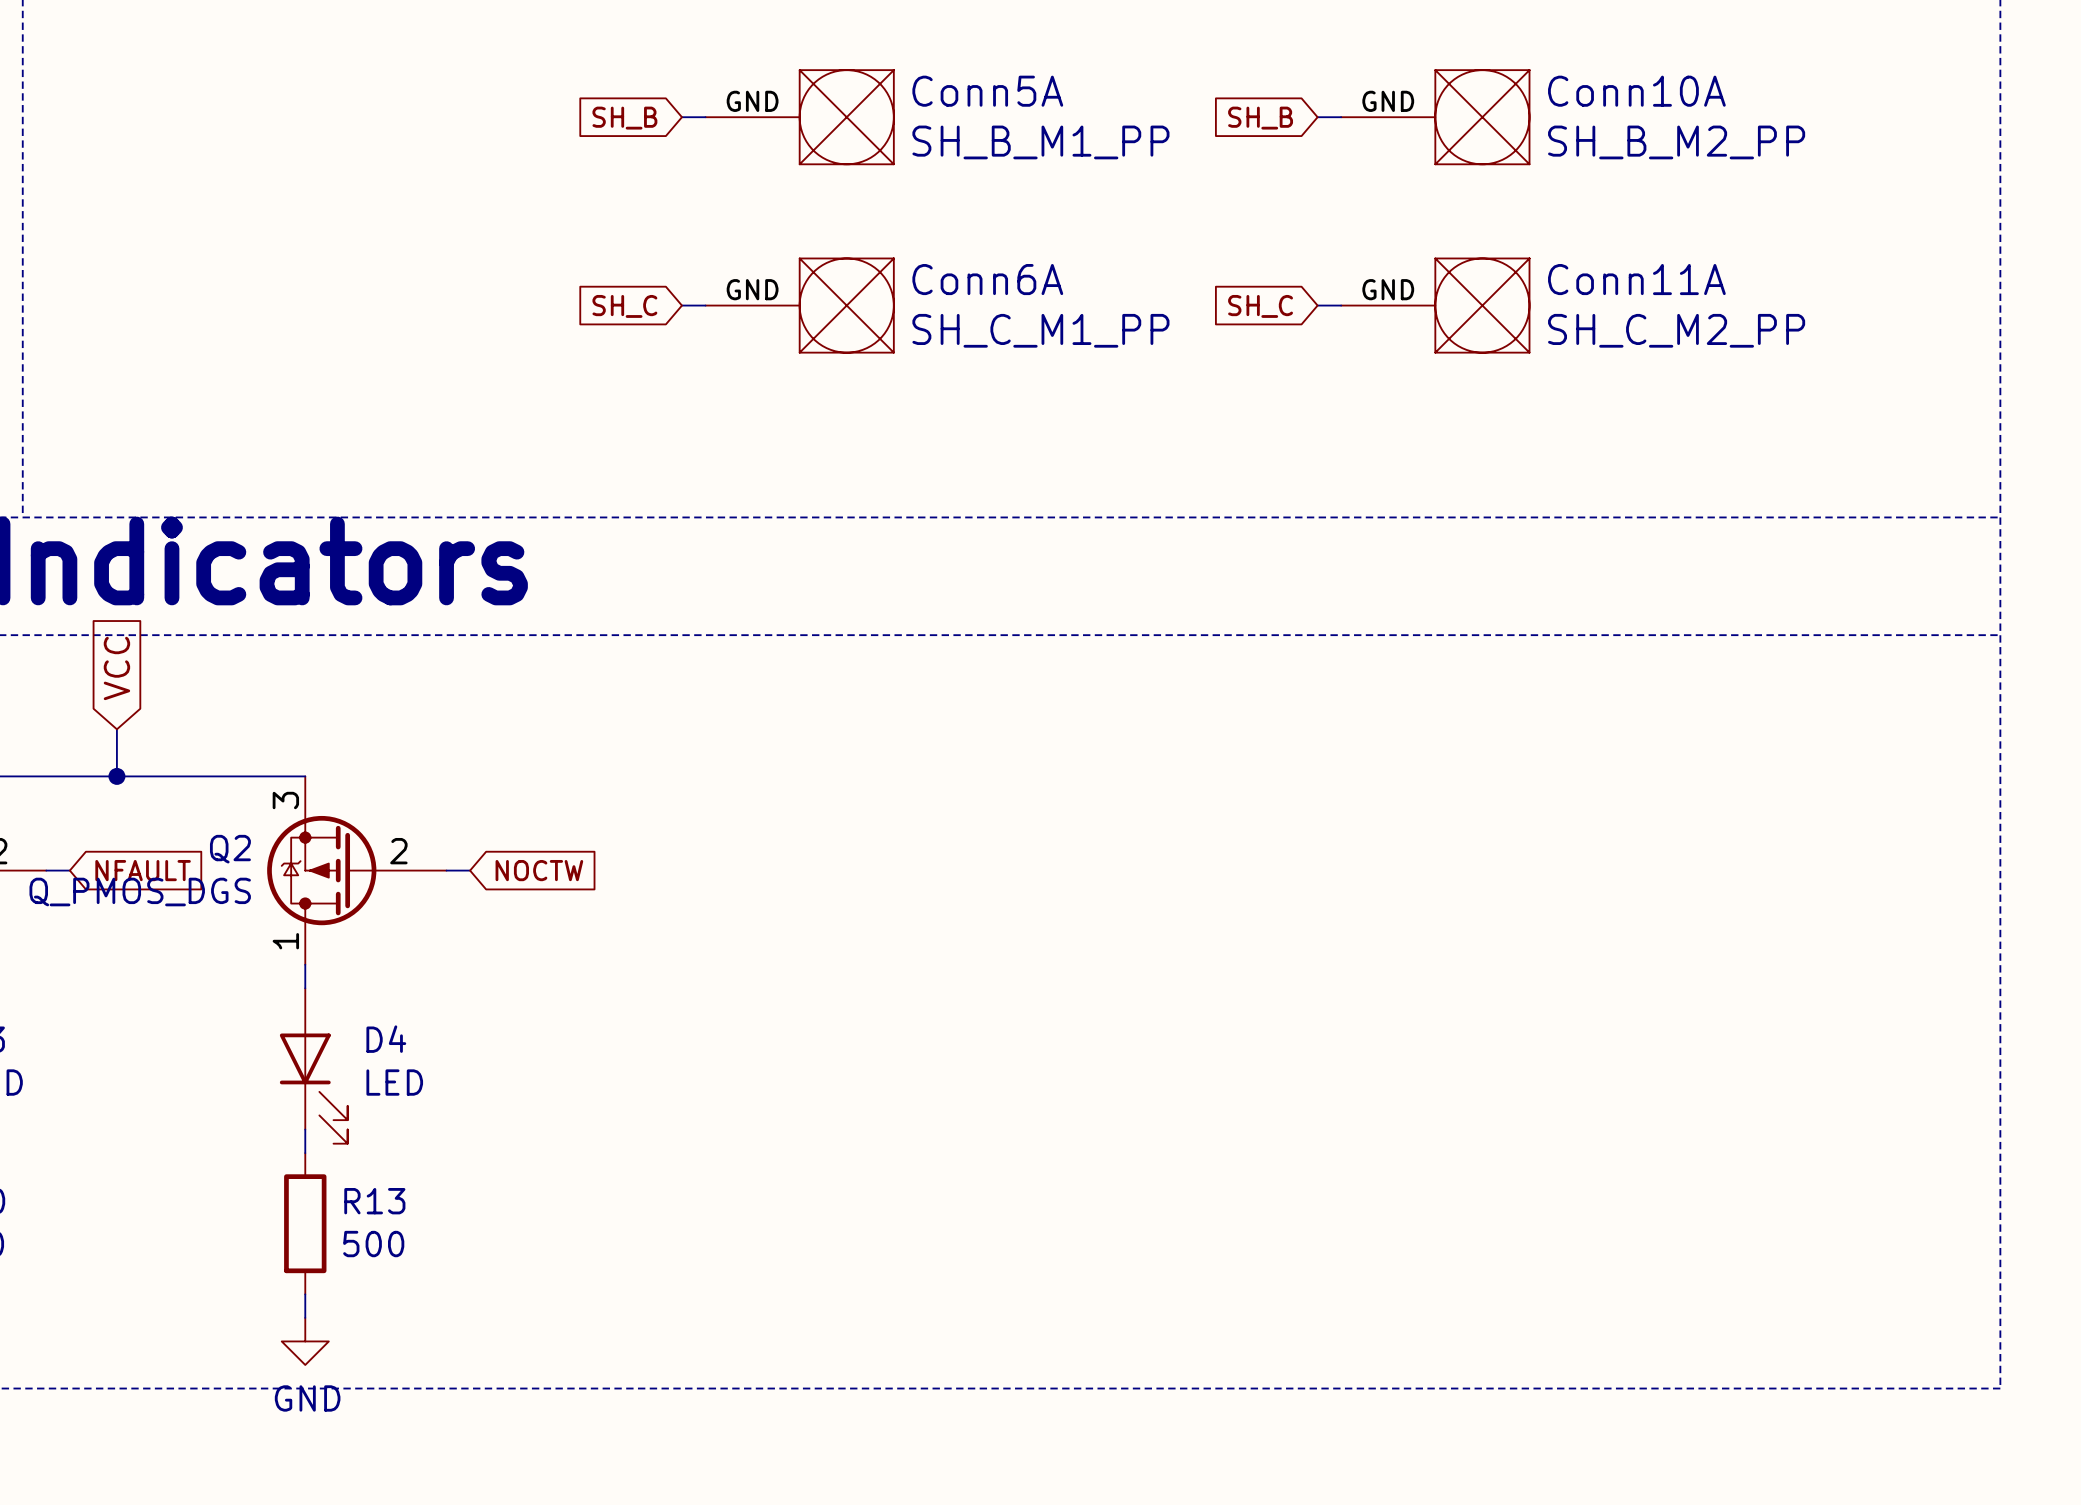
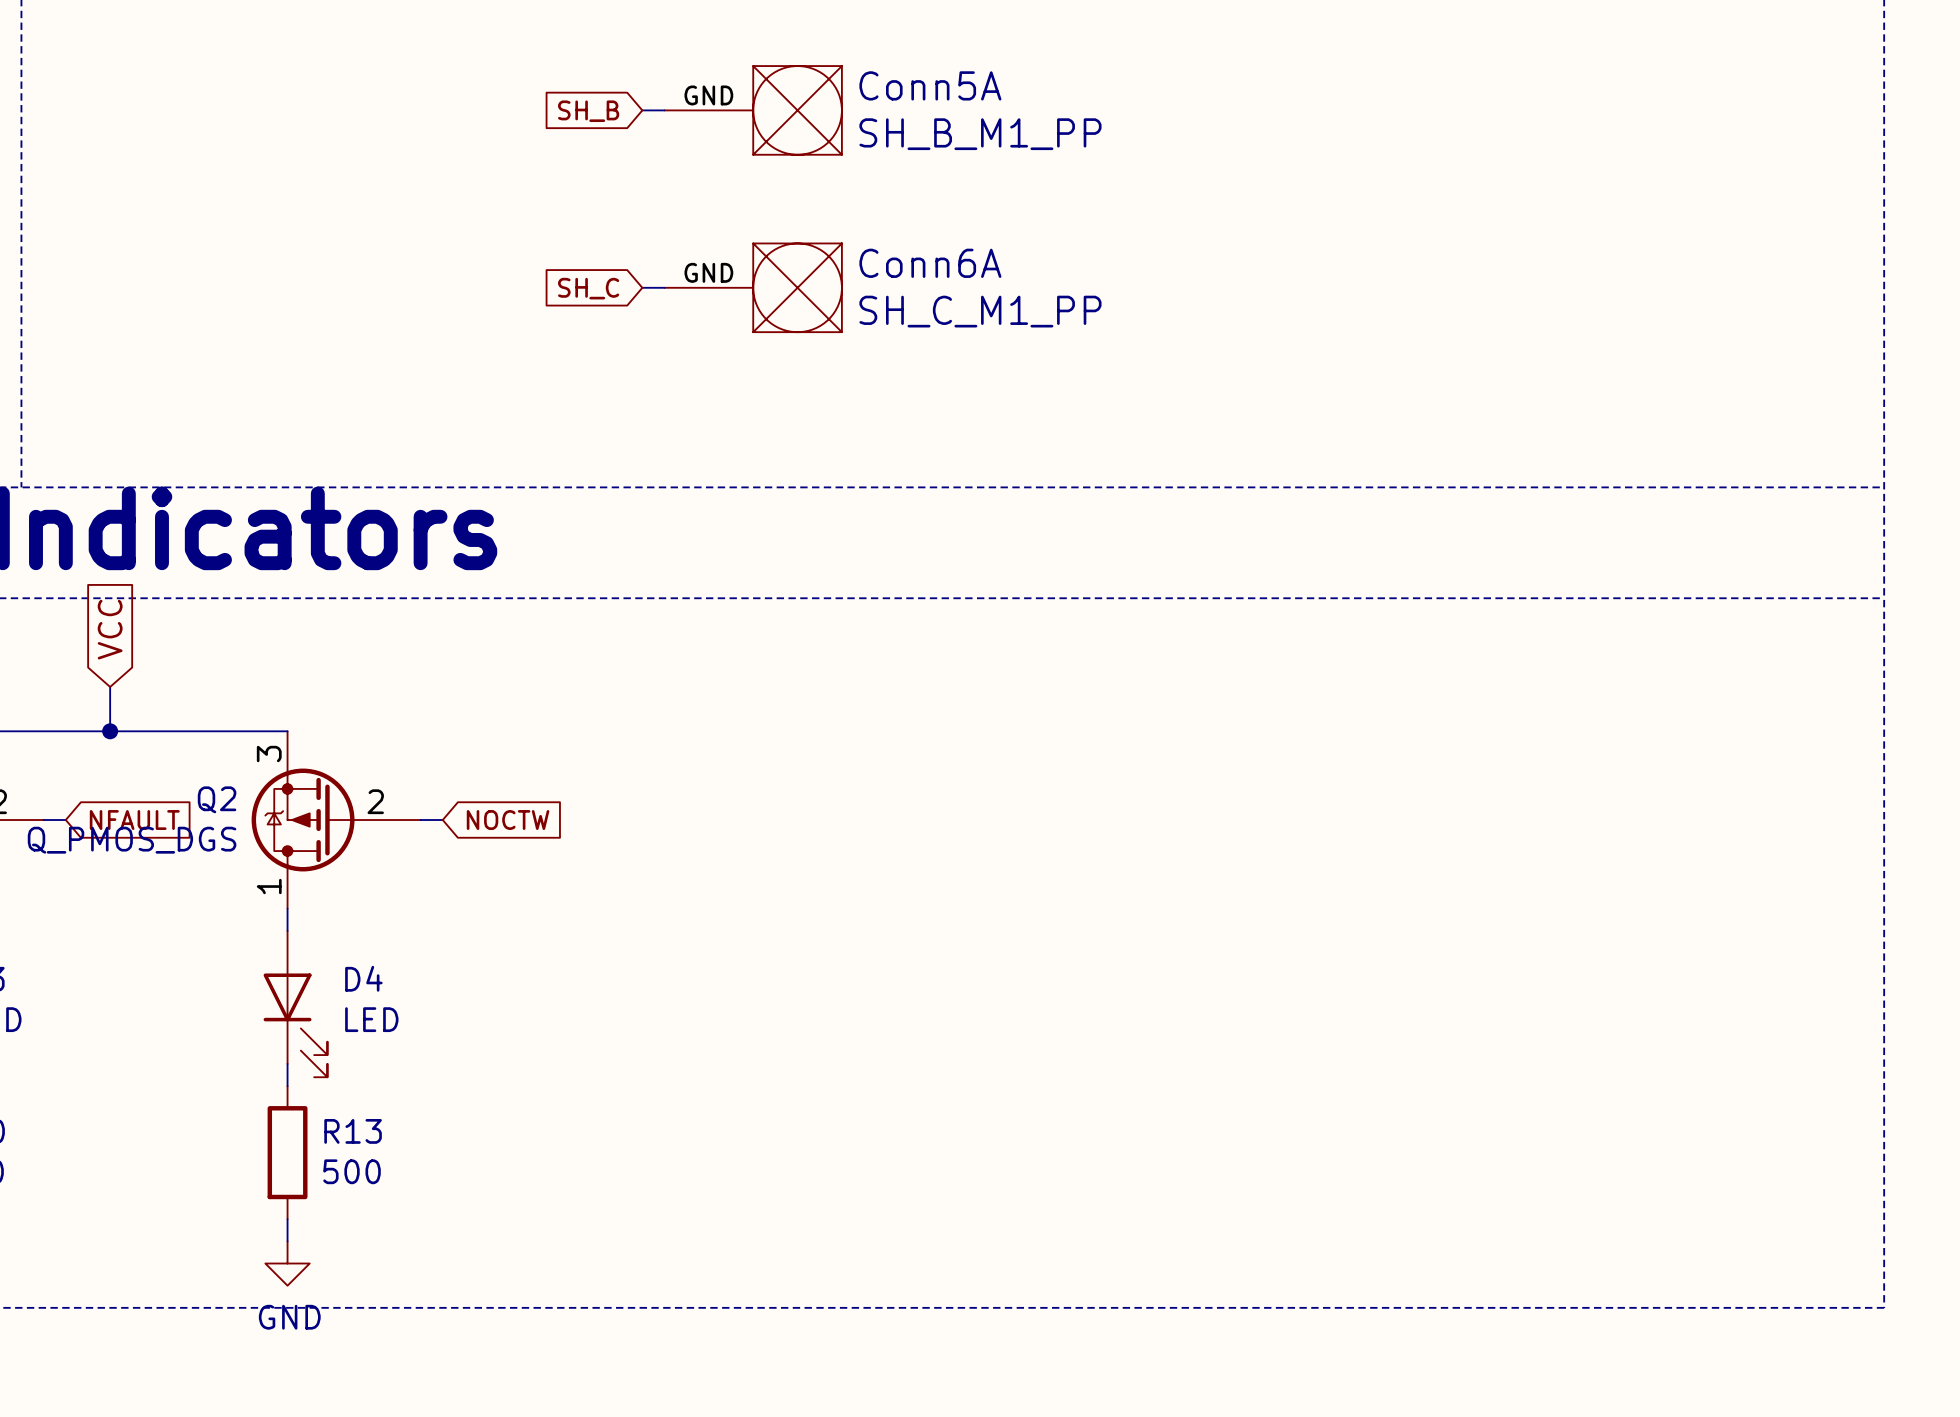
wire: (1317, 117) (1341, 117) -> none
Conn10A: SH_B_M2_PP (1435, 117) -> none
global label: SH_B (1260, 118) -> none
wire: (1317, 305) (1341, 305) -> none
Conn11A: SH_C_M2_PP (1435, 305) -> none
global label: SH_C (1260, 306) -> none

